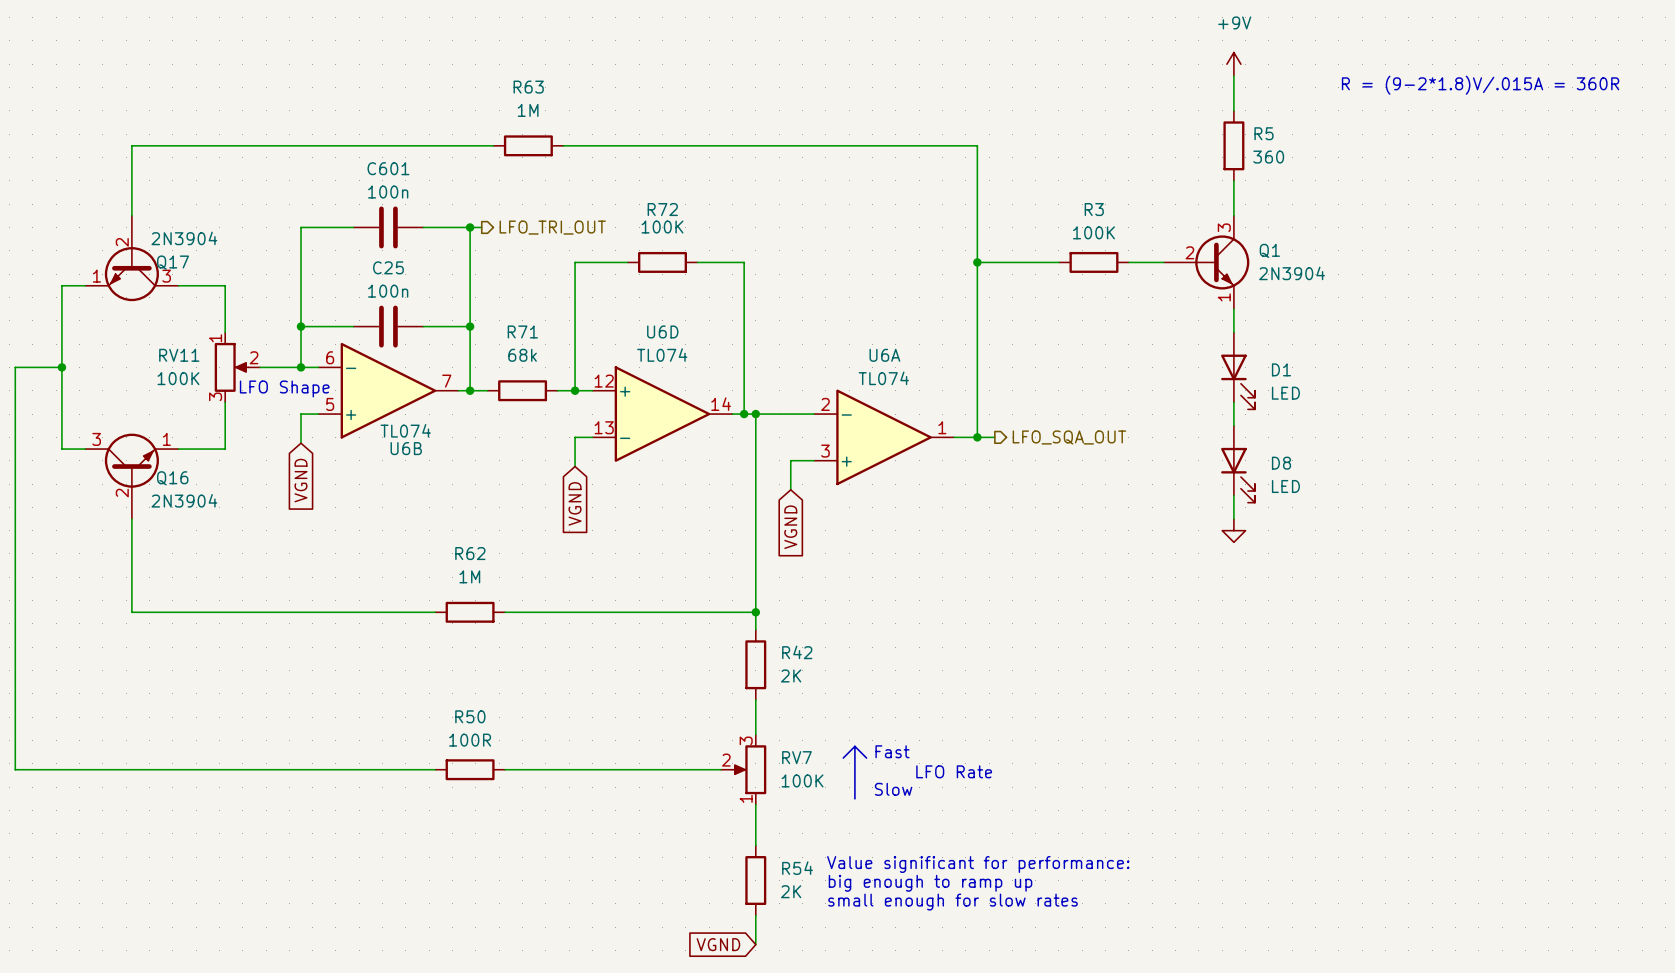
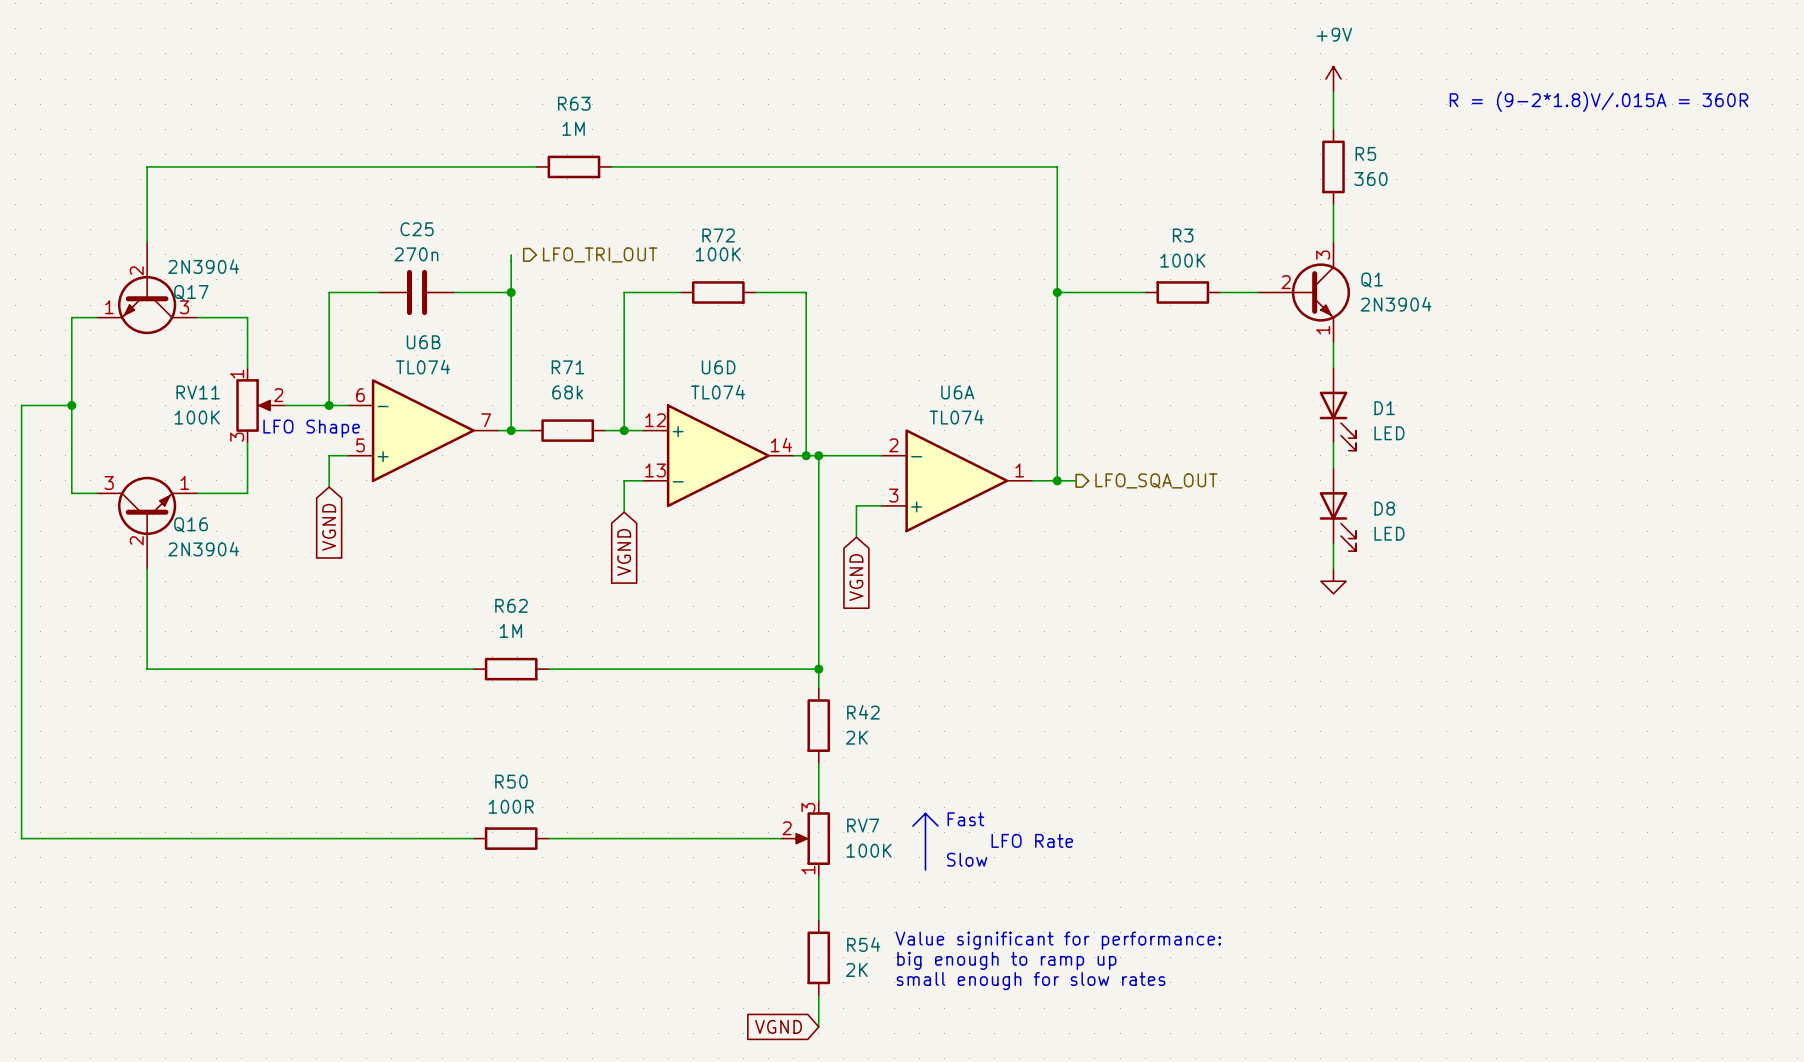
wire: (353, 227) (300, 227) (300, 262) -> (379, 292) (329, 292)
C601: 100n (388, 227) -> none
wire: (423, 227) (481, 227) -> none
junction: (470, 227) -> none
junction: none -> (511, 292)
C25 value: 100n (388, 291) -> 270n (416, 254)
wire: (300, 326) (353, 326) -> (454, 292) (511, 292)
junction: (300, 326) -> none
C25 position: (388, 326) -> (417, 292)
wire: (423, 326) (470, 326) -> none
junction: (470, 326) -> none
U6B value position: TL074 (405, 430) -> TL074 (423, 367)
U6B name position: U6B (406, 448) -> U6B (423, 342)

